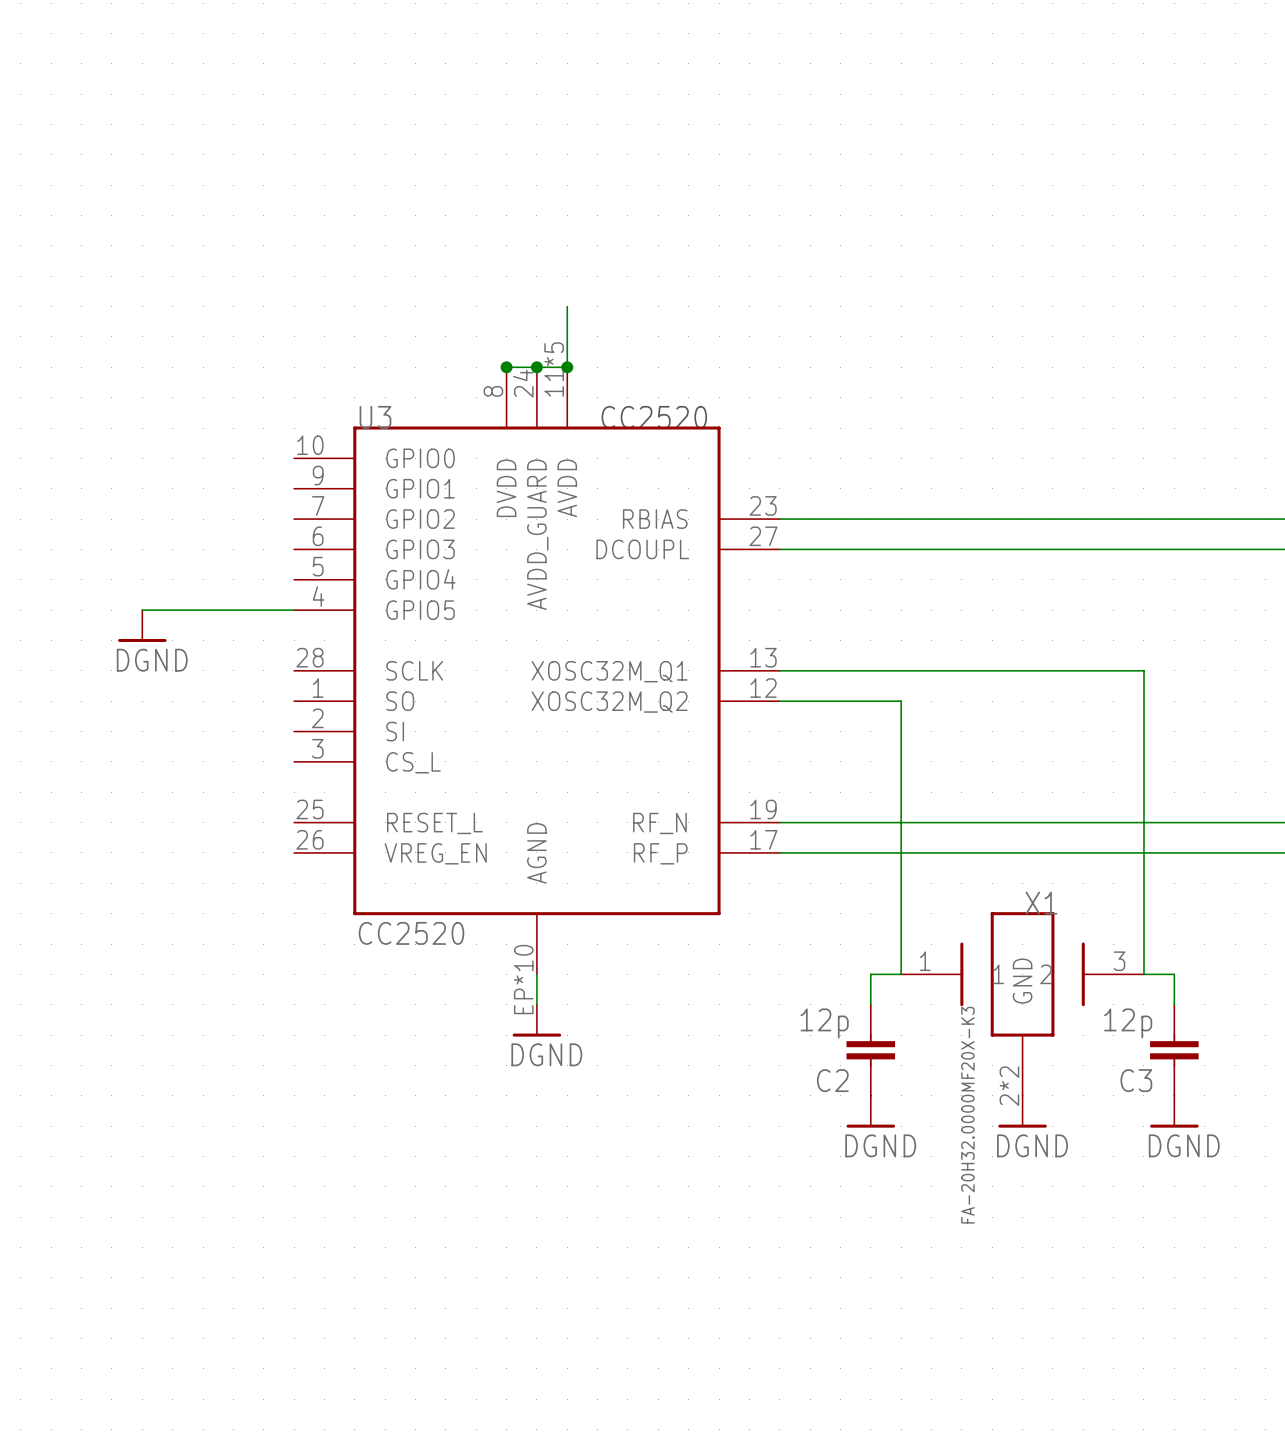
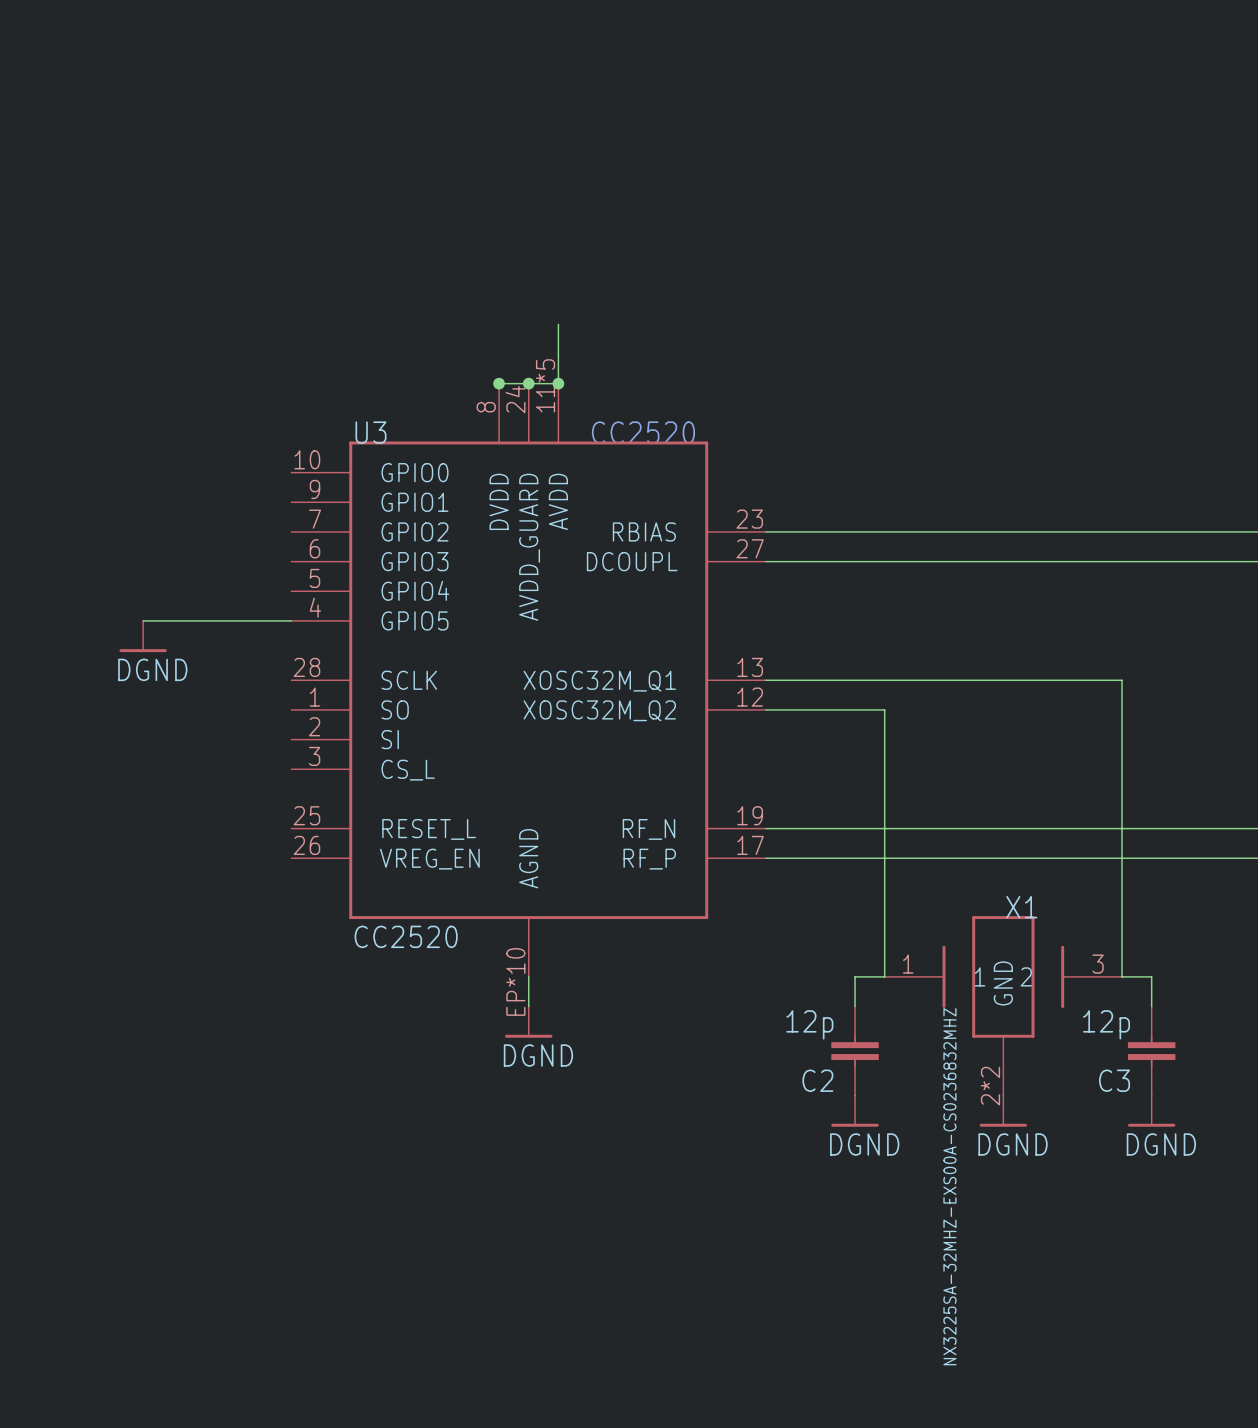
X1 value: FA-20H32.0000MF20X-K3 (967, 1115) -> NX3225SA-32MHZ-EXS00A-CS0236832MHZ (949, 1186)

